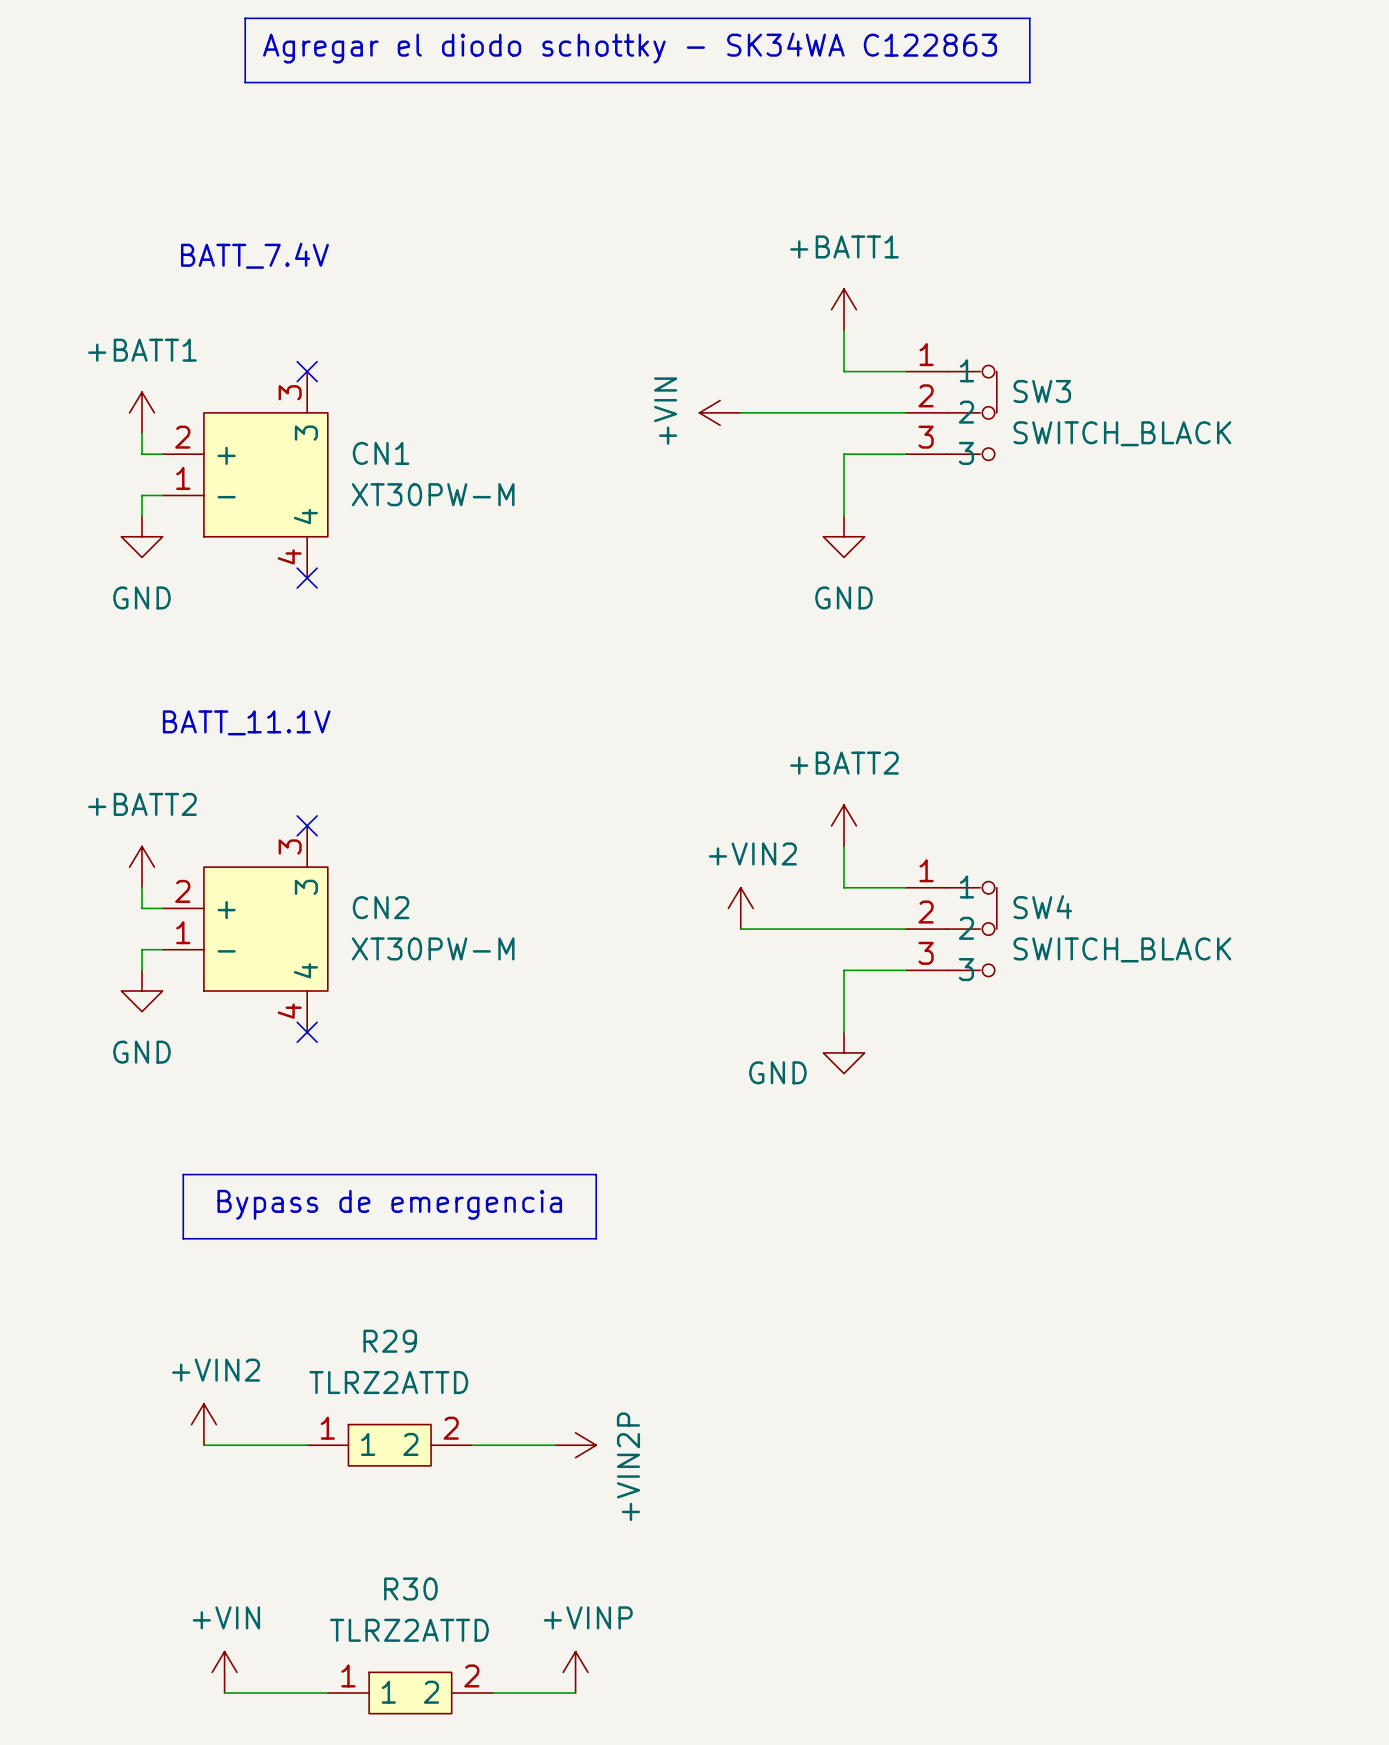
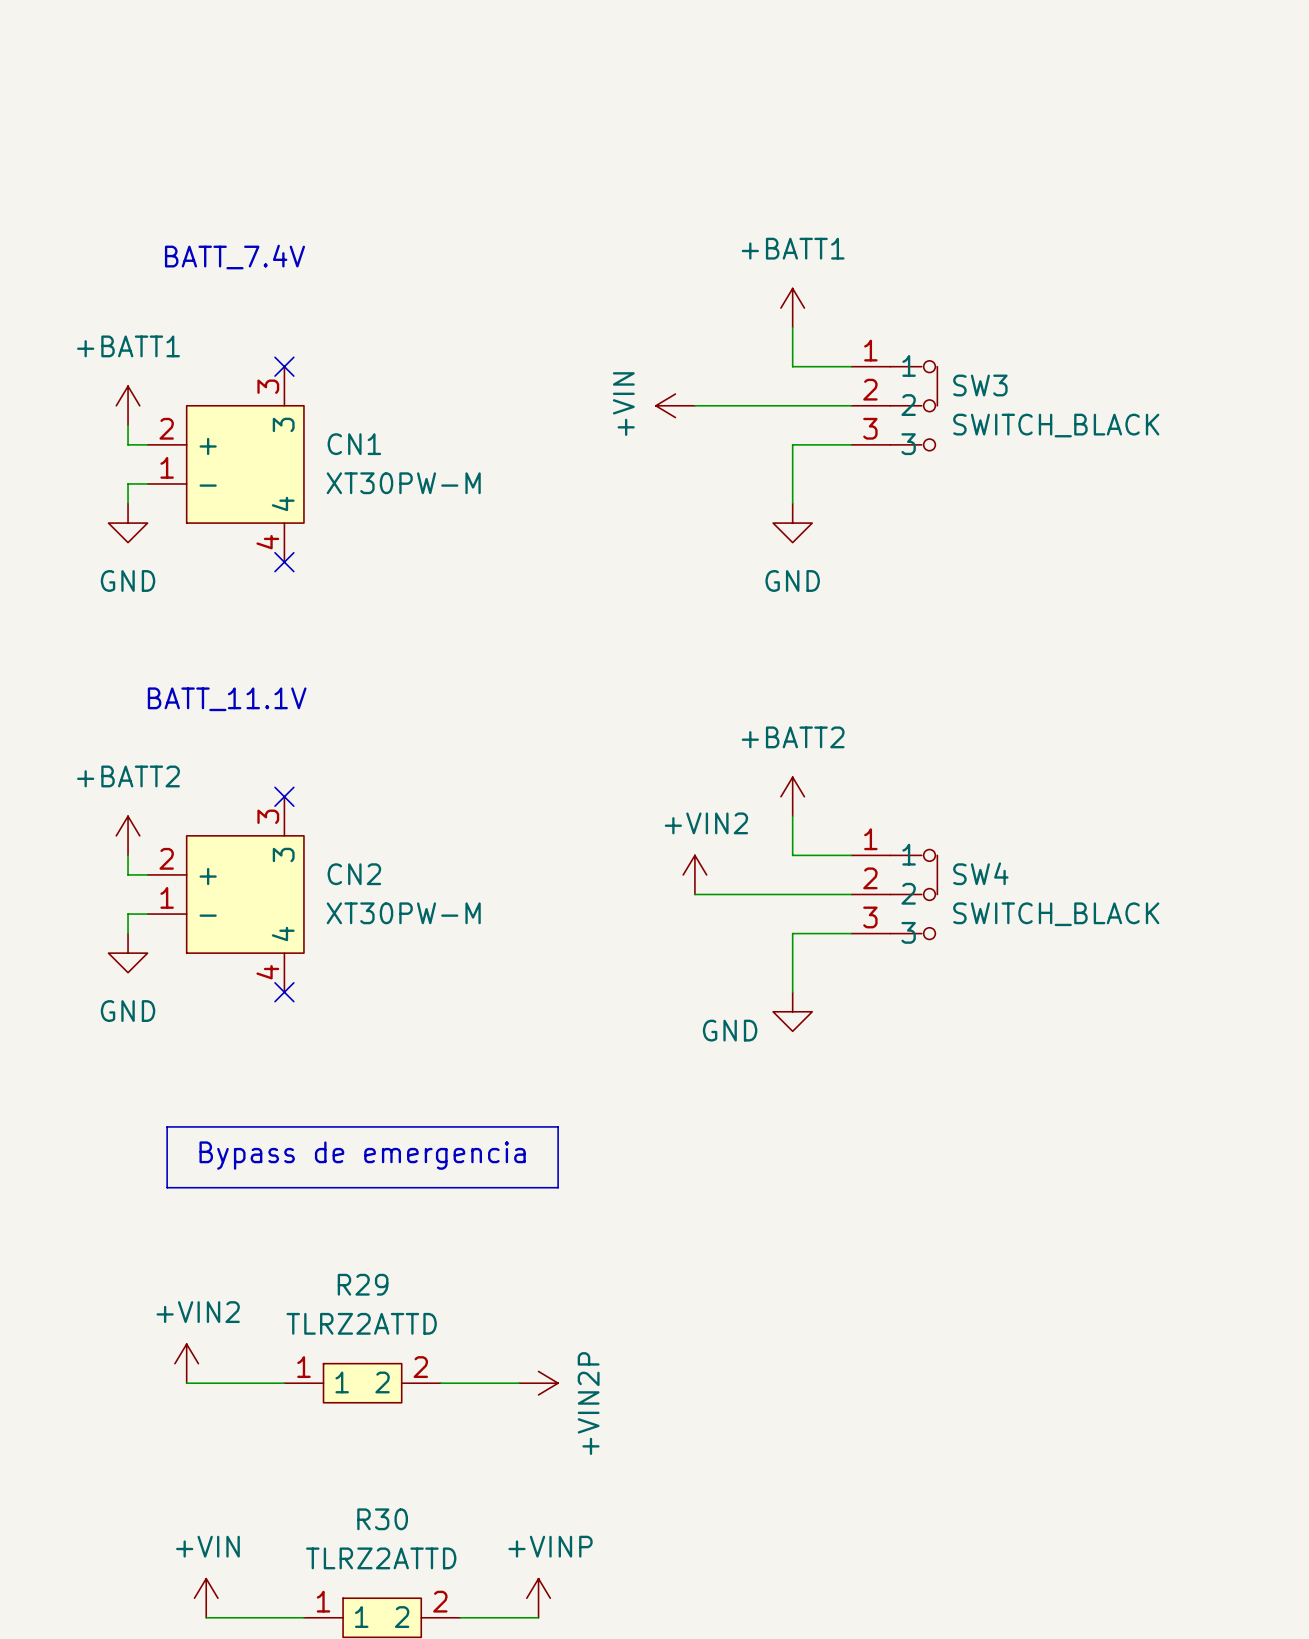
line: (245, 18) (1029, 18) (1029, 82) (245, 82) (245, 18) -> none
text: Agregar el diodo schottky - SK34WA C122863 (630, 48) -> none

